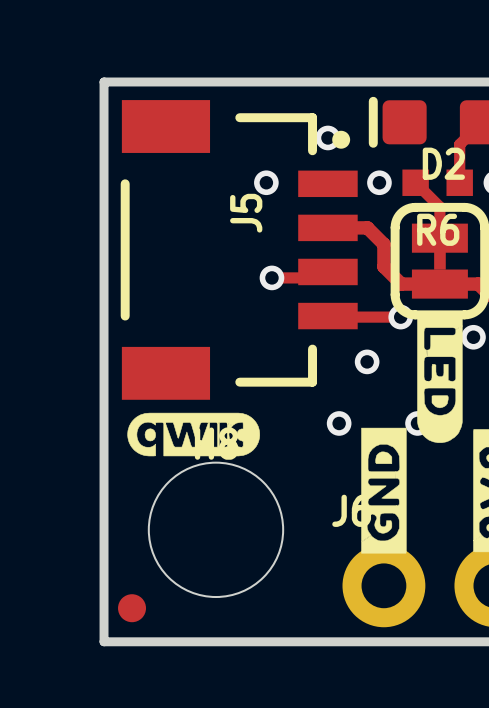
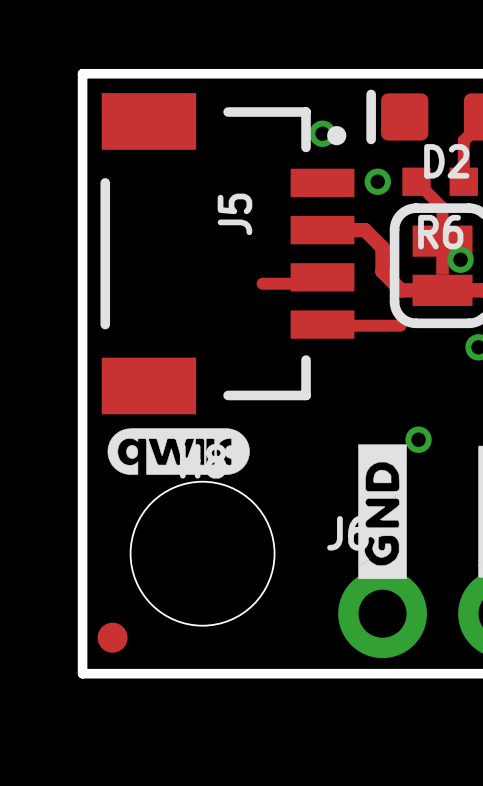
via: (266, 182) -> none
via: none -> (460, 259)
via: (271, 277) -> none
drawing: [417, 314, 463, 443] -> none
via: (400, 317) -> none
via: (367, 361) -> none
via: (339, 423) -> none

